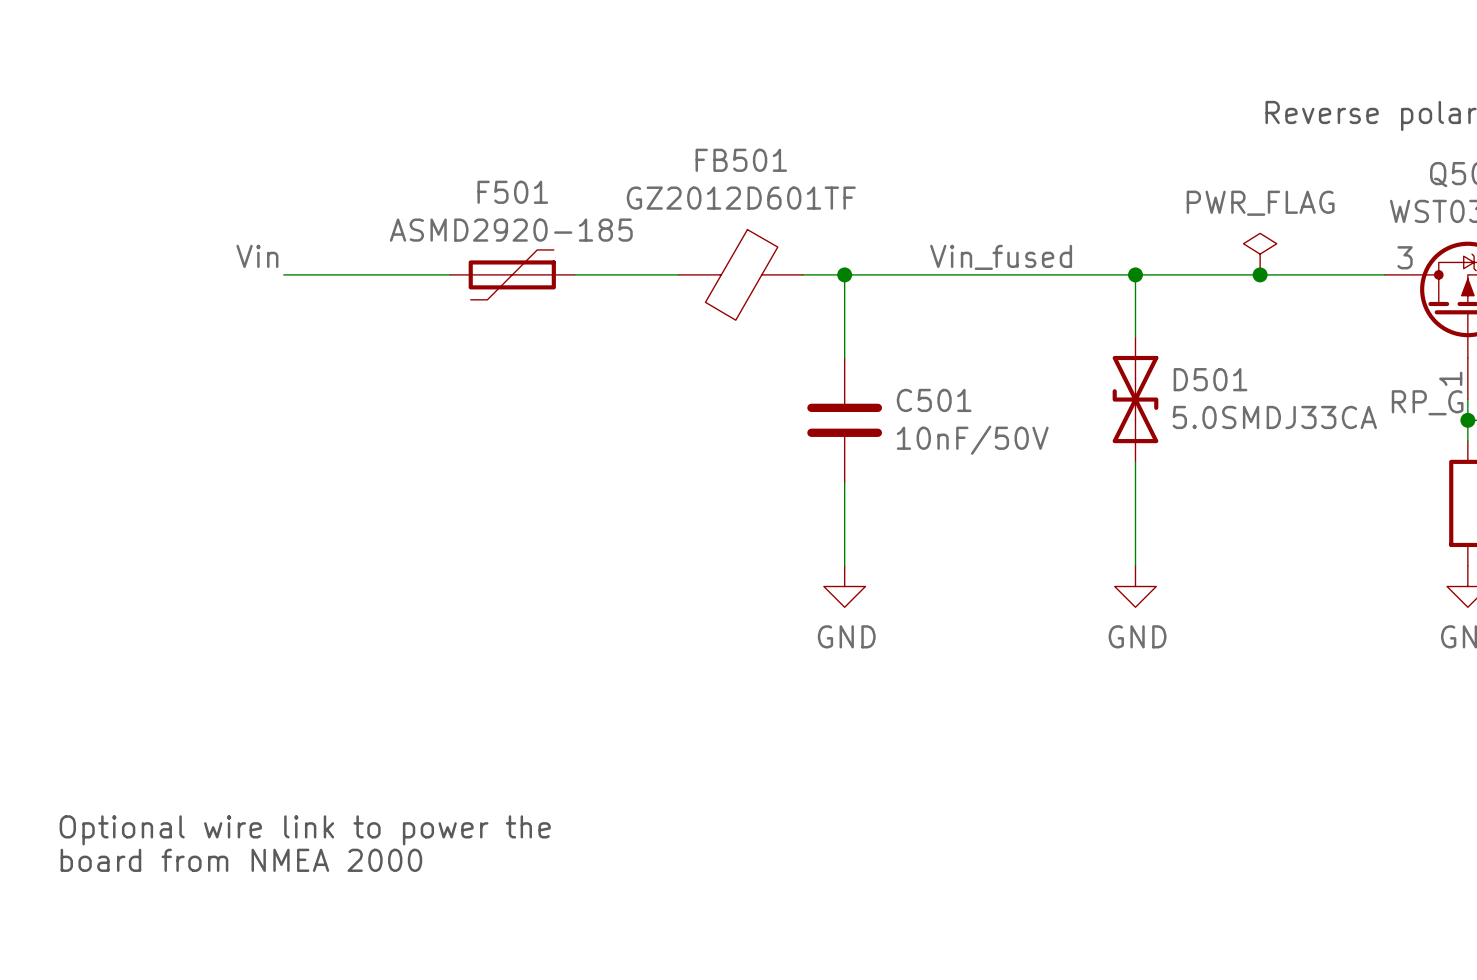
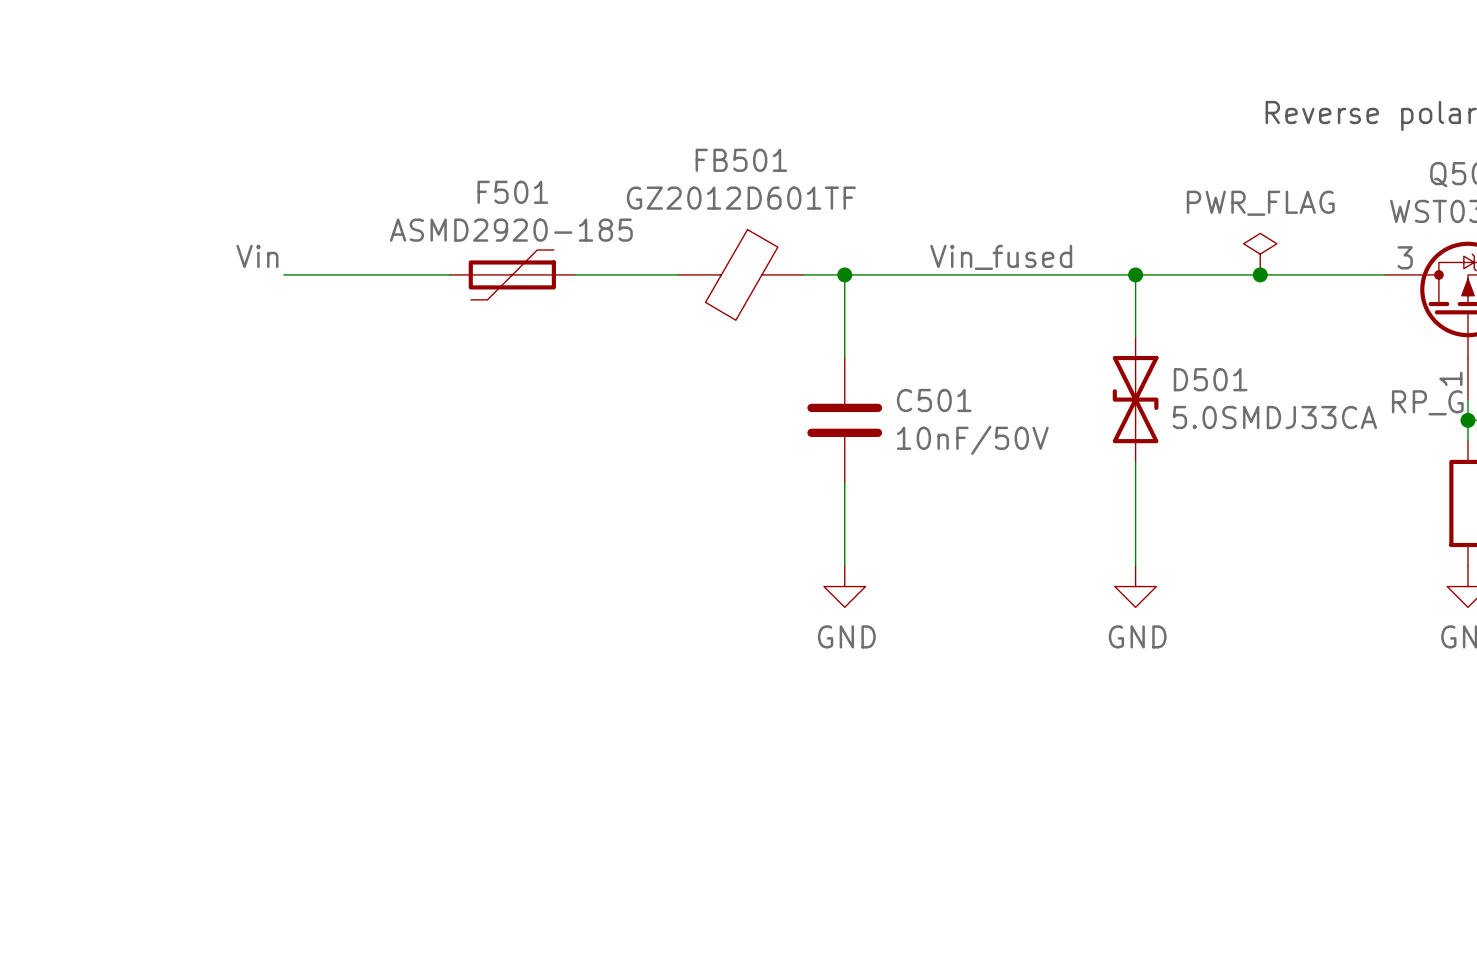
text: Optional wire link to power the (305, 830) -> none
text: board from NMEA 2000 (241, 860) -> none

